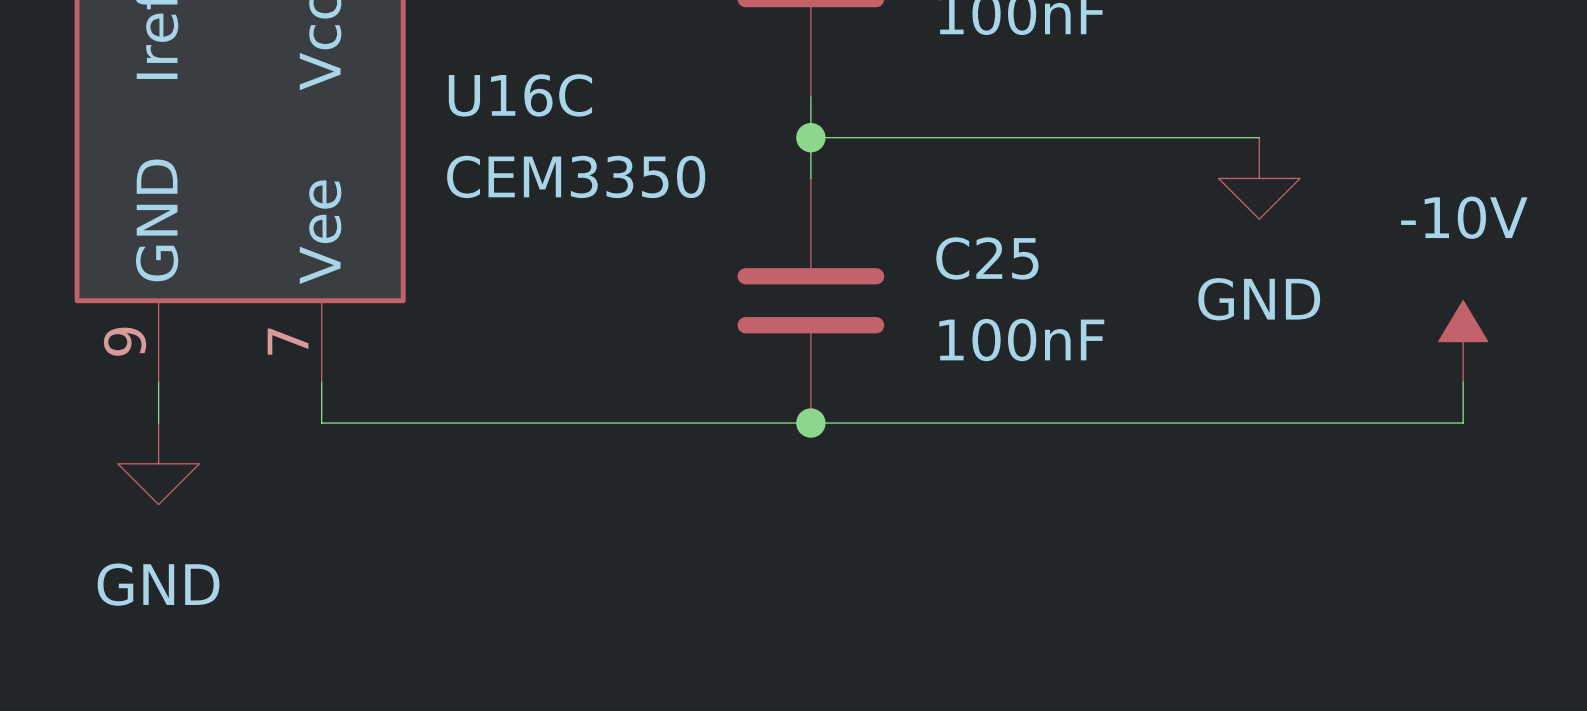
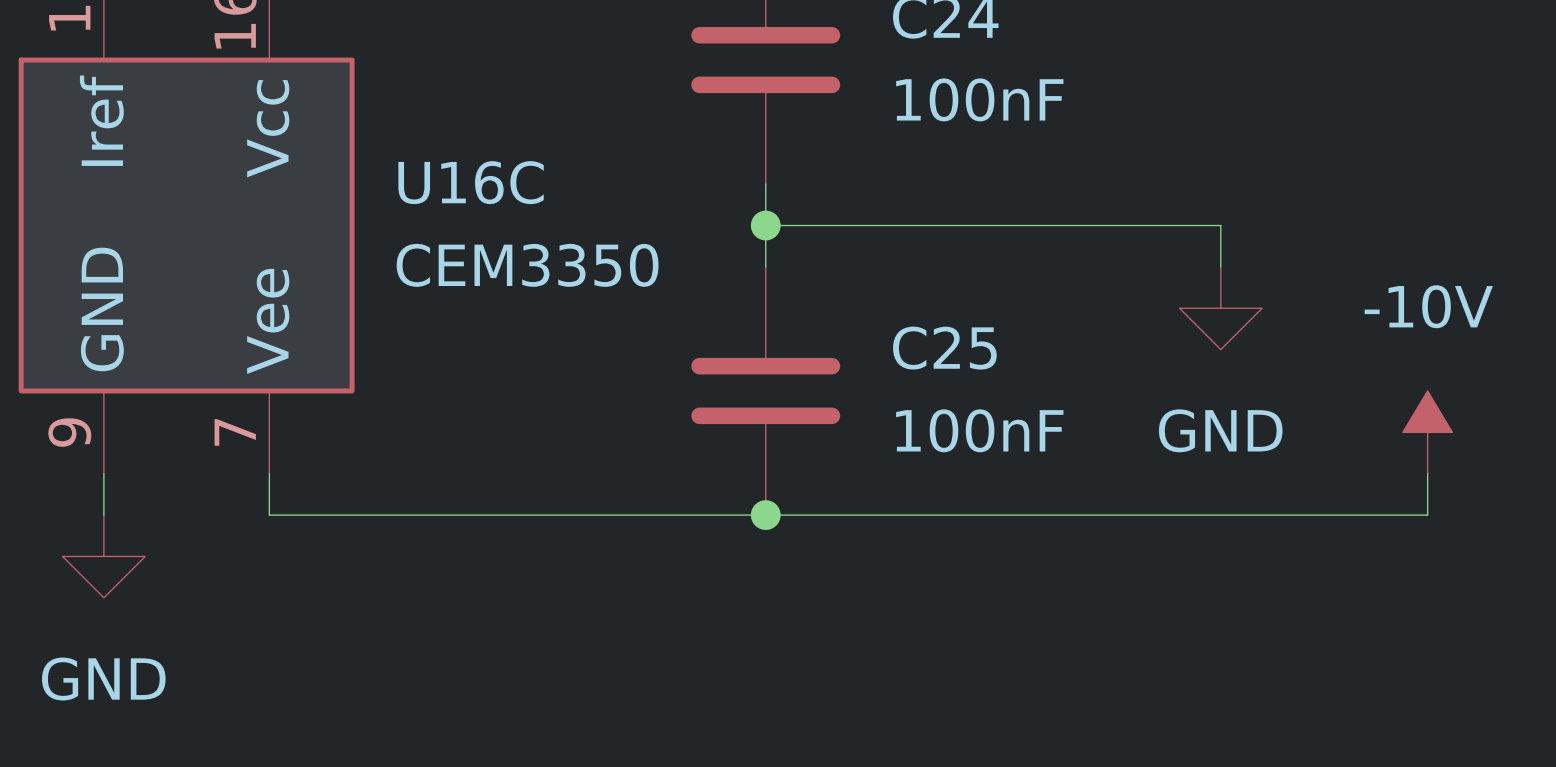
power symbol position: GND (1259, 178) -> GND (1220, 308)

